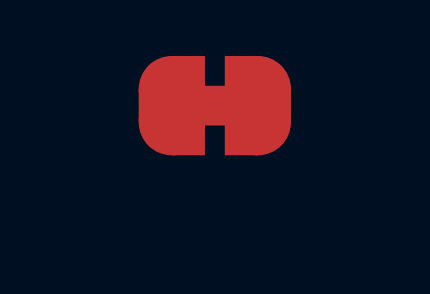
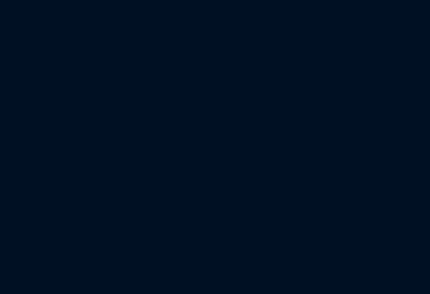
part: (214, 105) -> none

